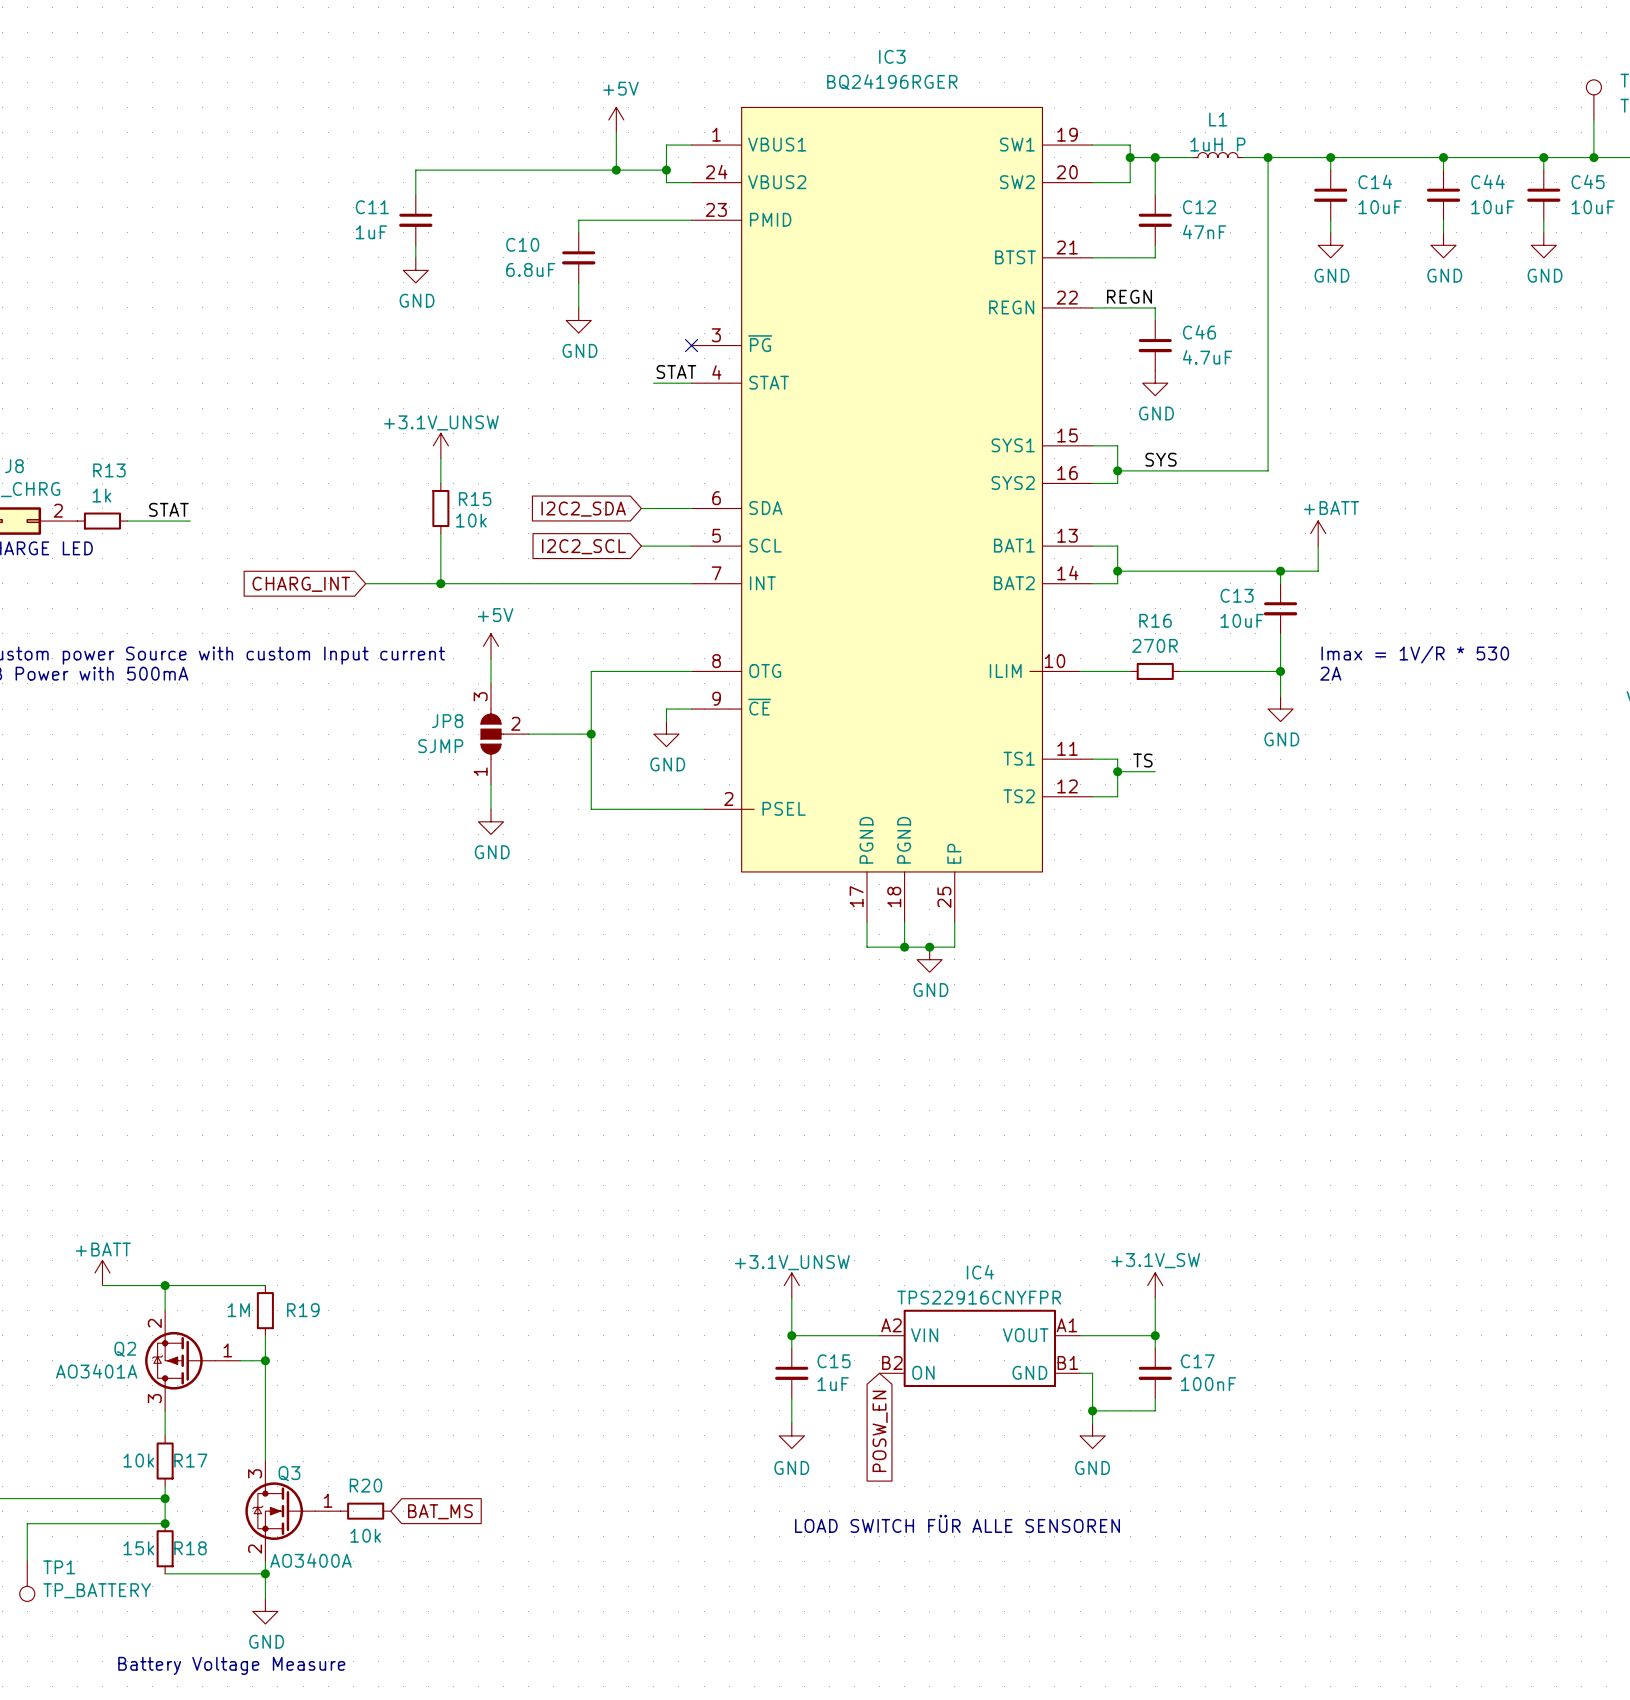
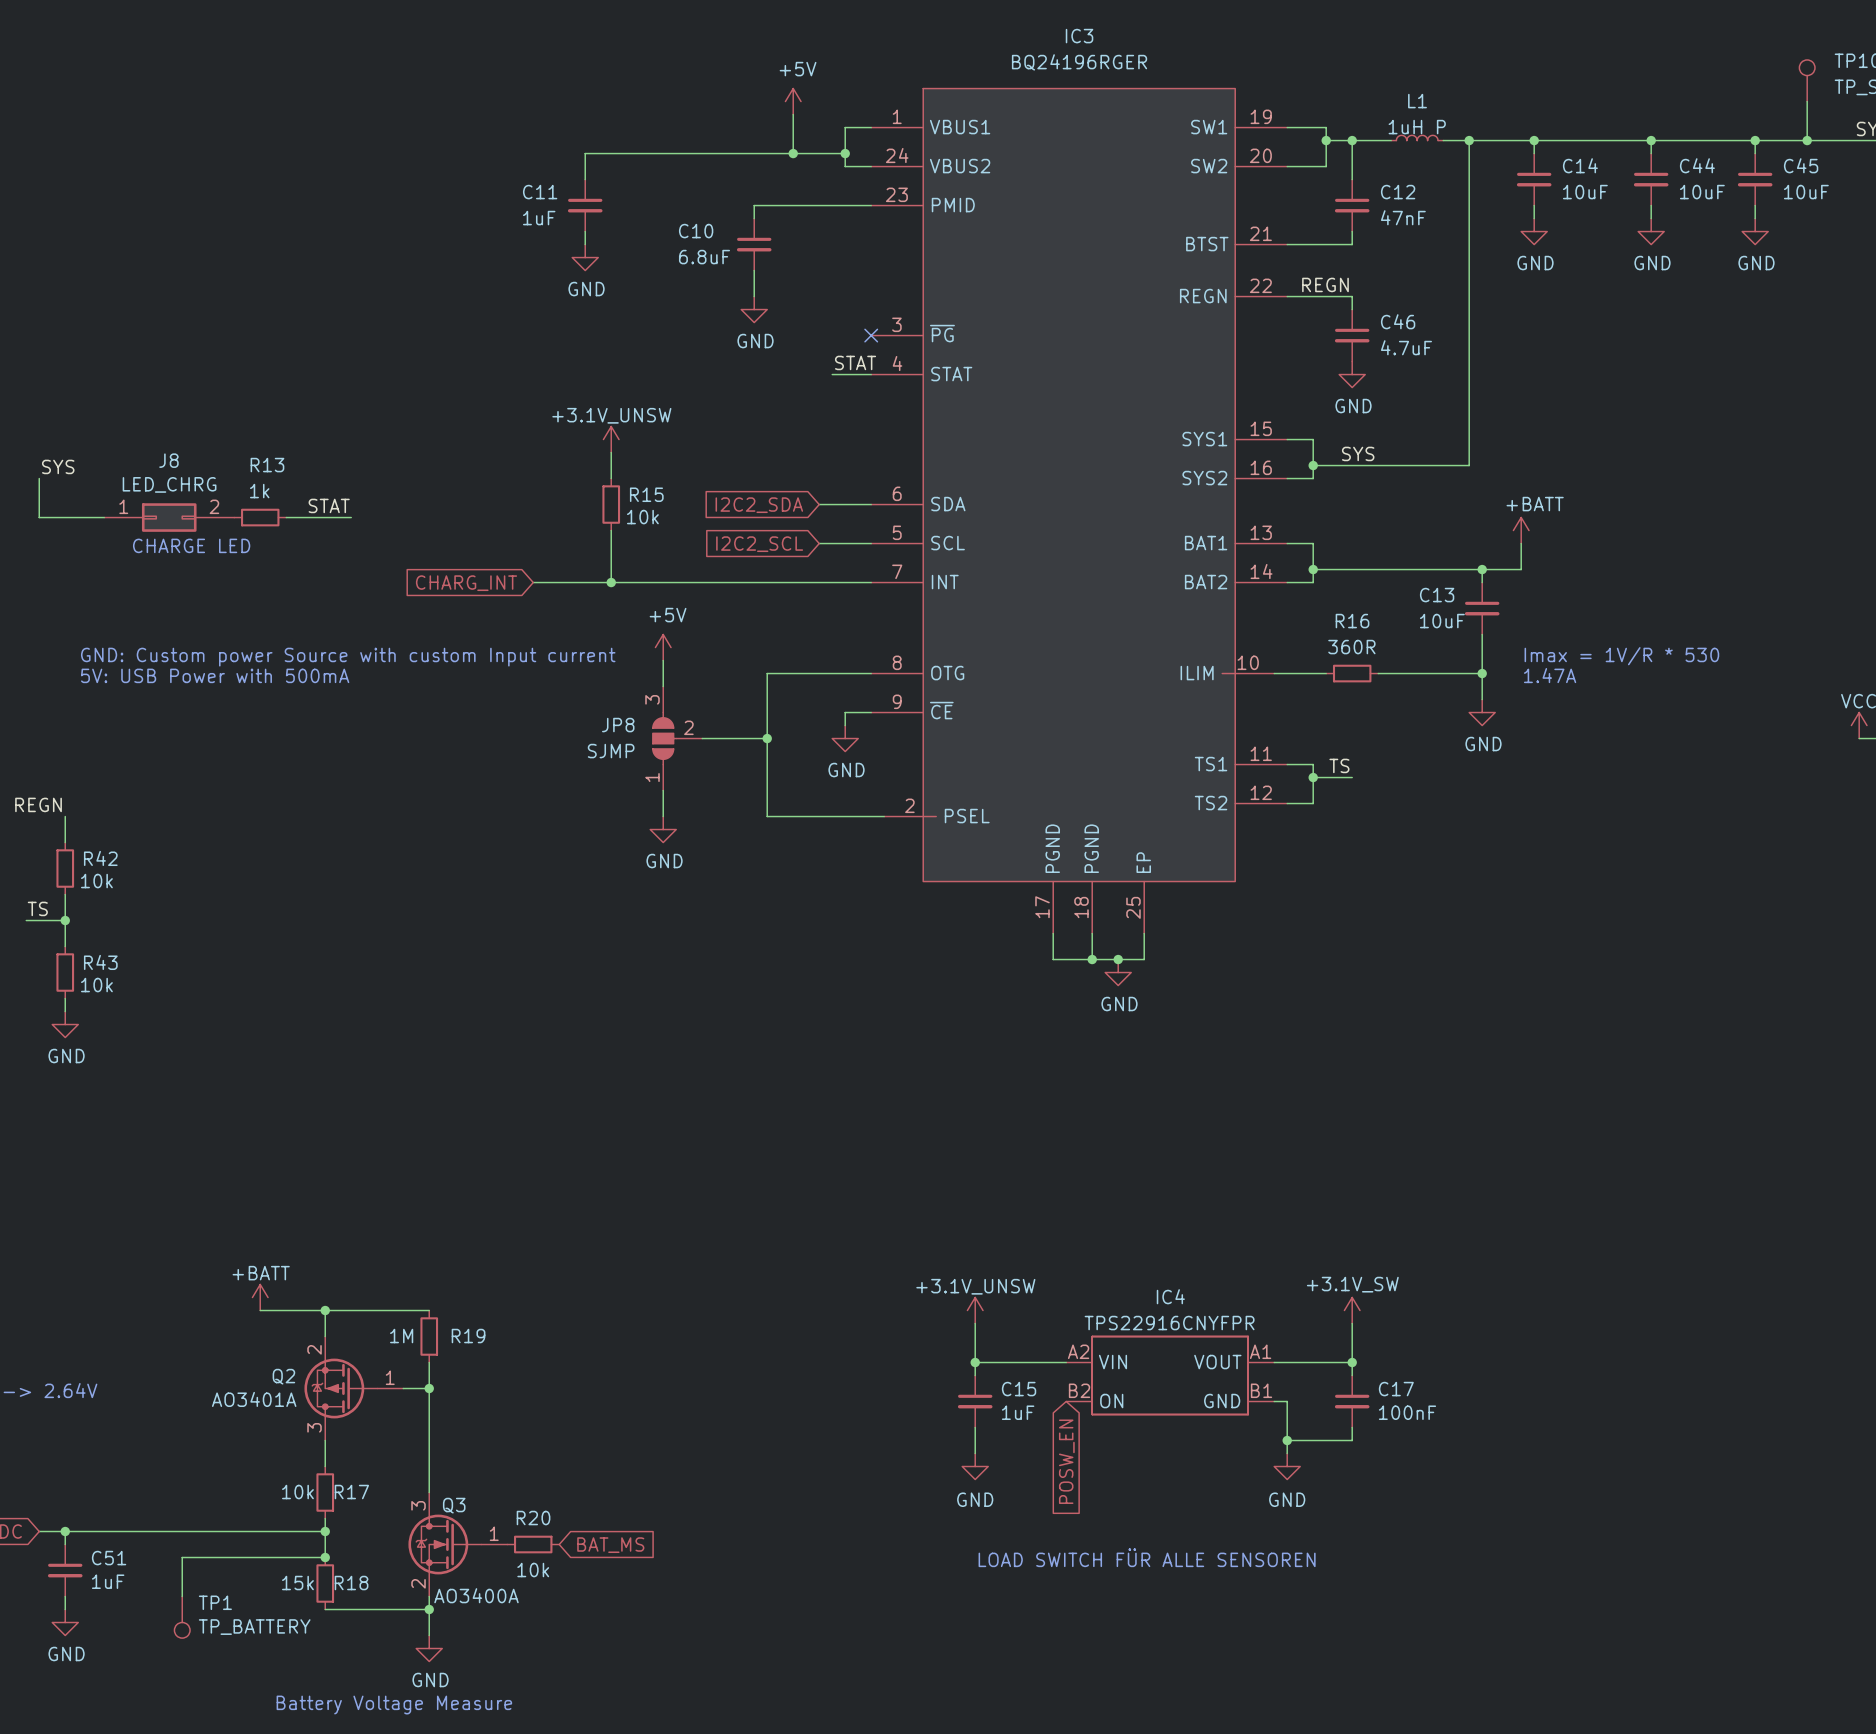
R16 value: 270R (1154, 645) -> 360R (1351, 647)
text: 2A (1330, 673) -> 1.47A (1550, 675)

